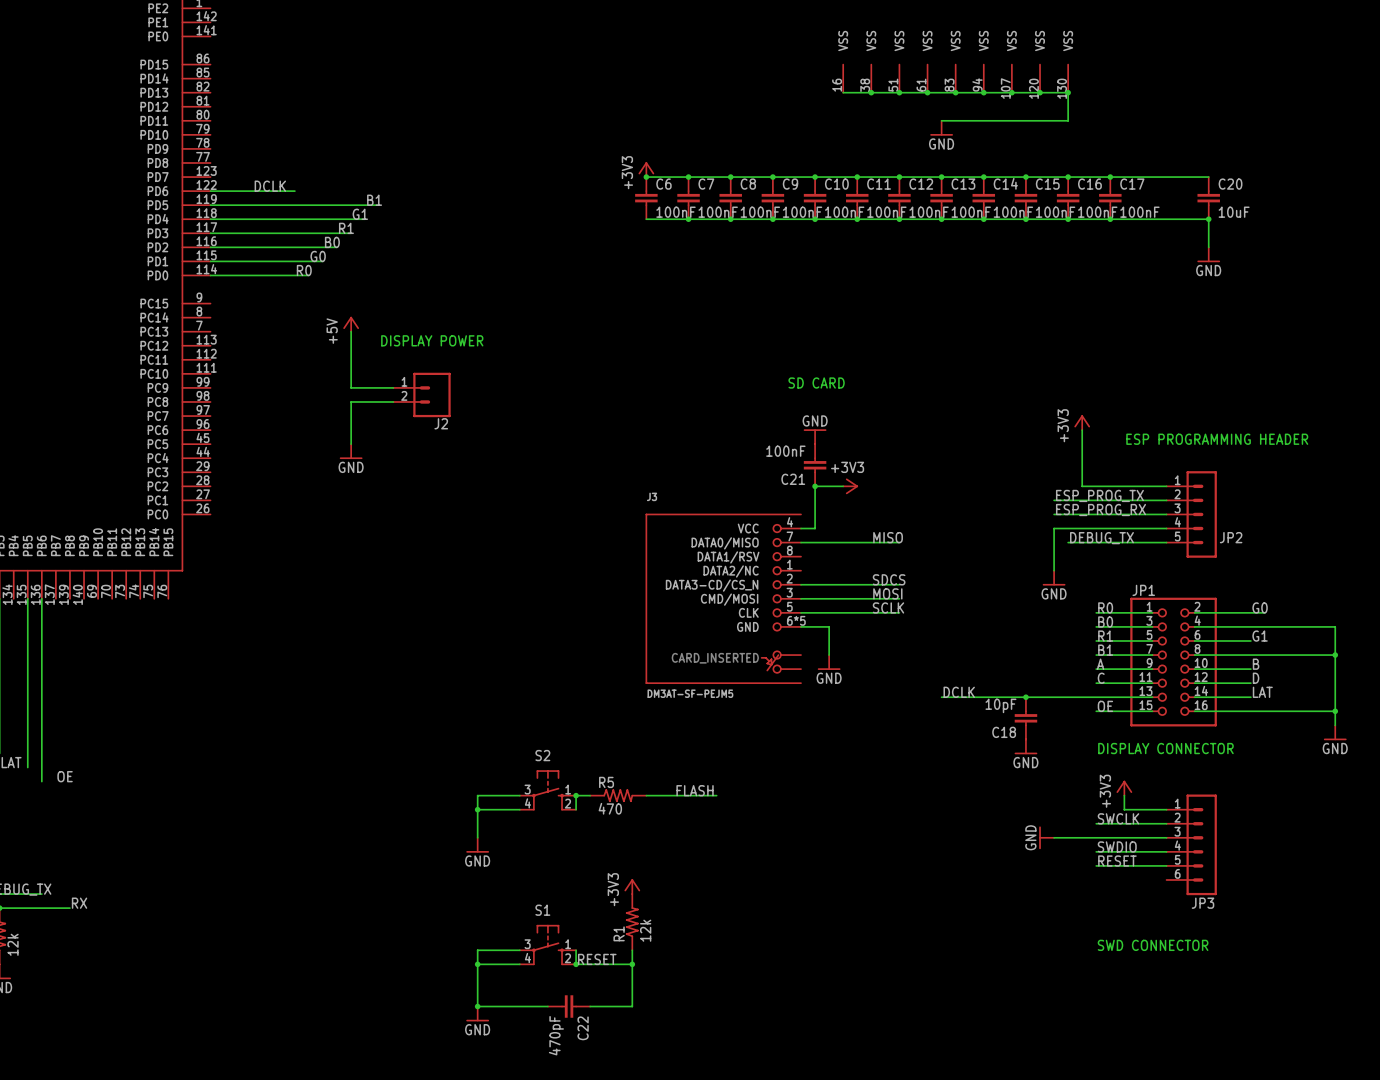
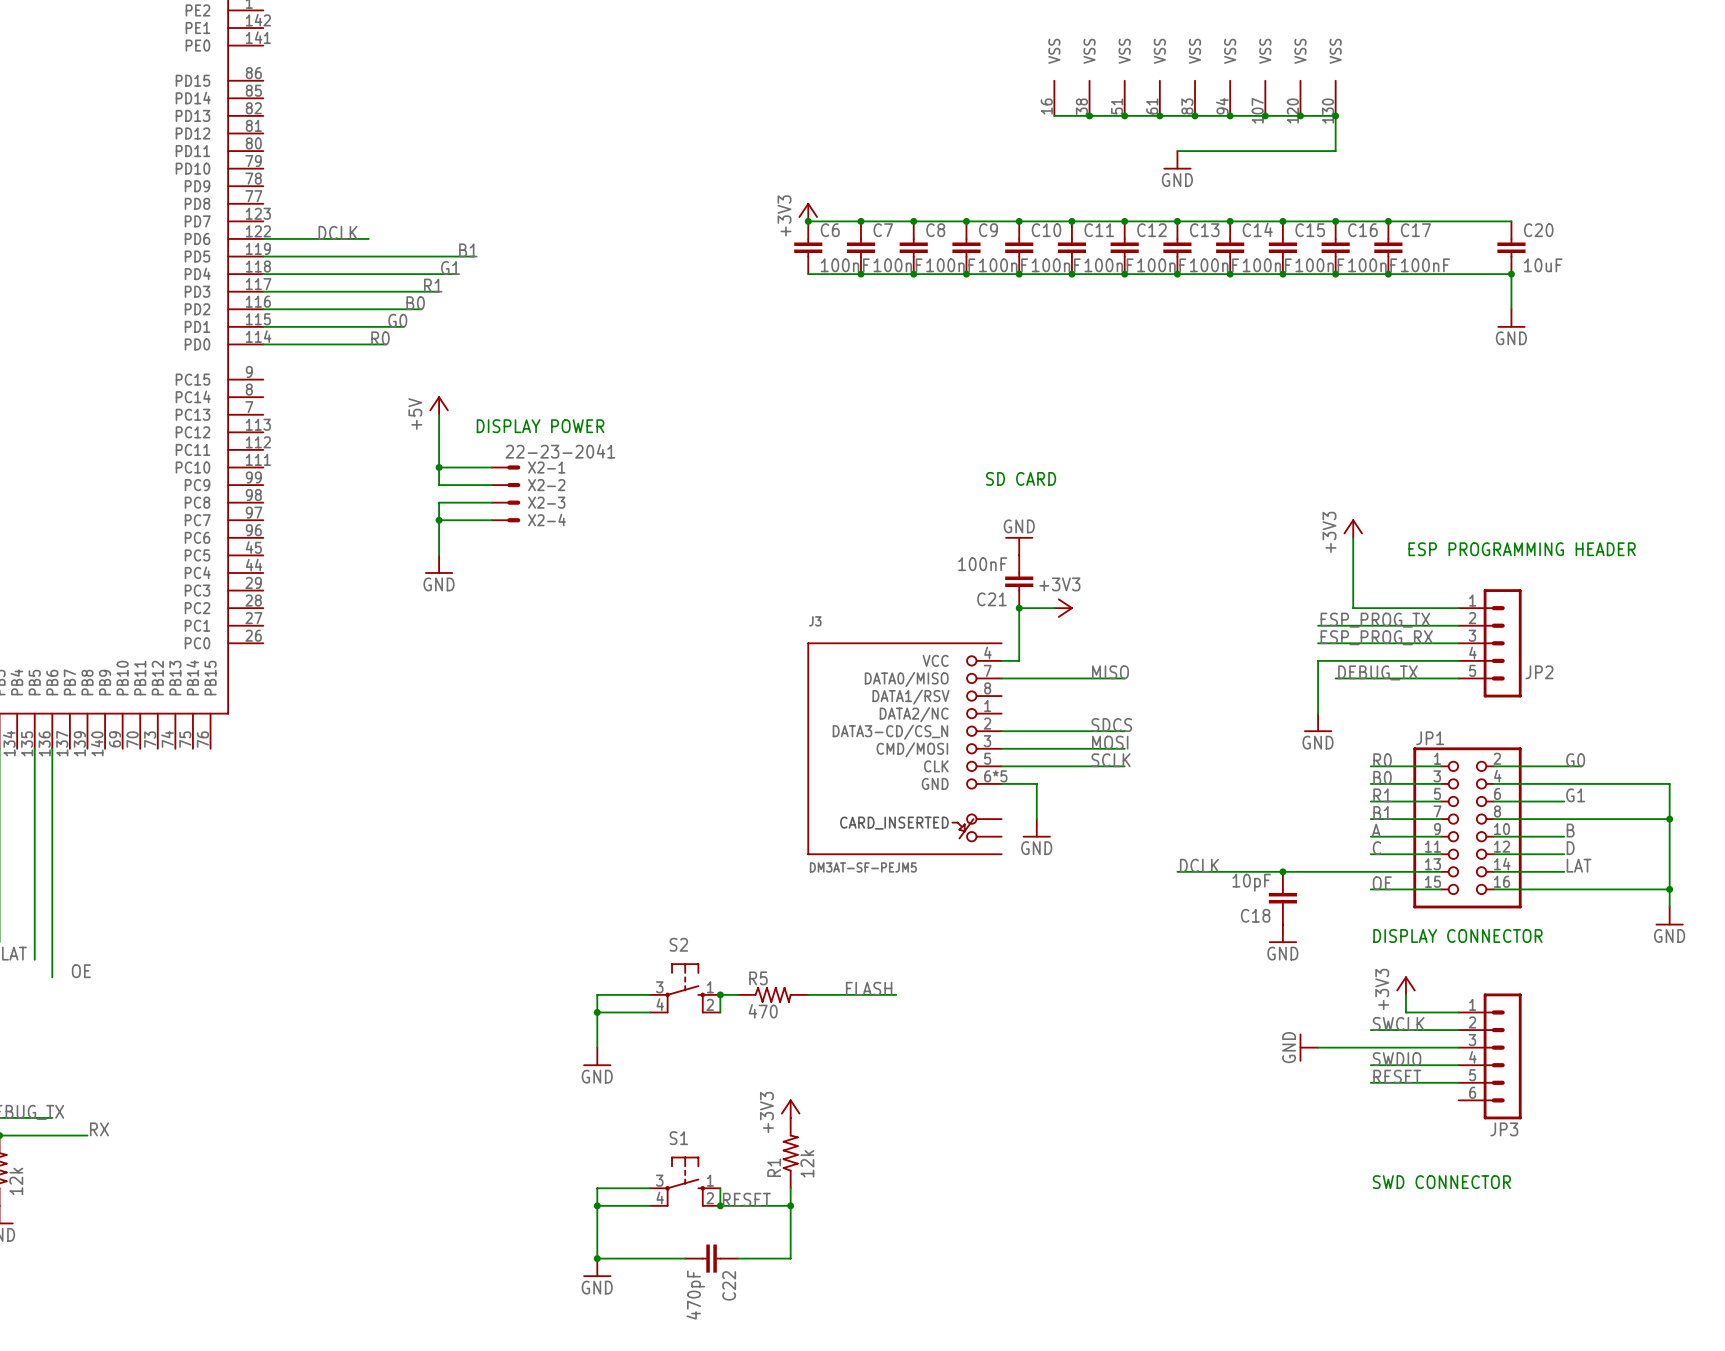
wire: none -> (439, 467) (491, 467)
junction: none -> (439, 467)
X2-1: none -> 22-23-2041 (506, 467)
X2-2: none -> (506, 485)
J2: (421, 394) -> none
X2-3: none -> (506, 502)
wire: none -> (439, 520) (491, 520)
junction: none -> (439, 520)
X2-4: none -> (506, 520)

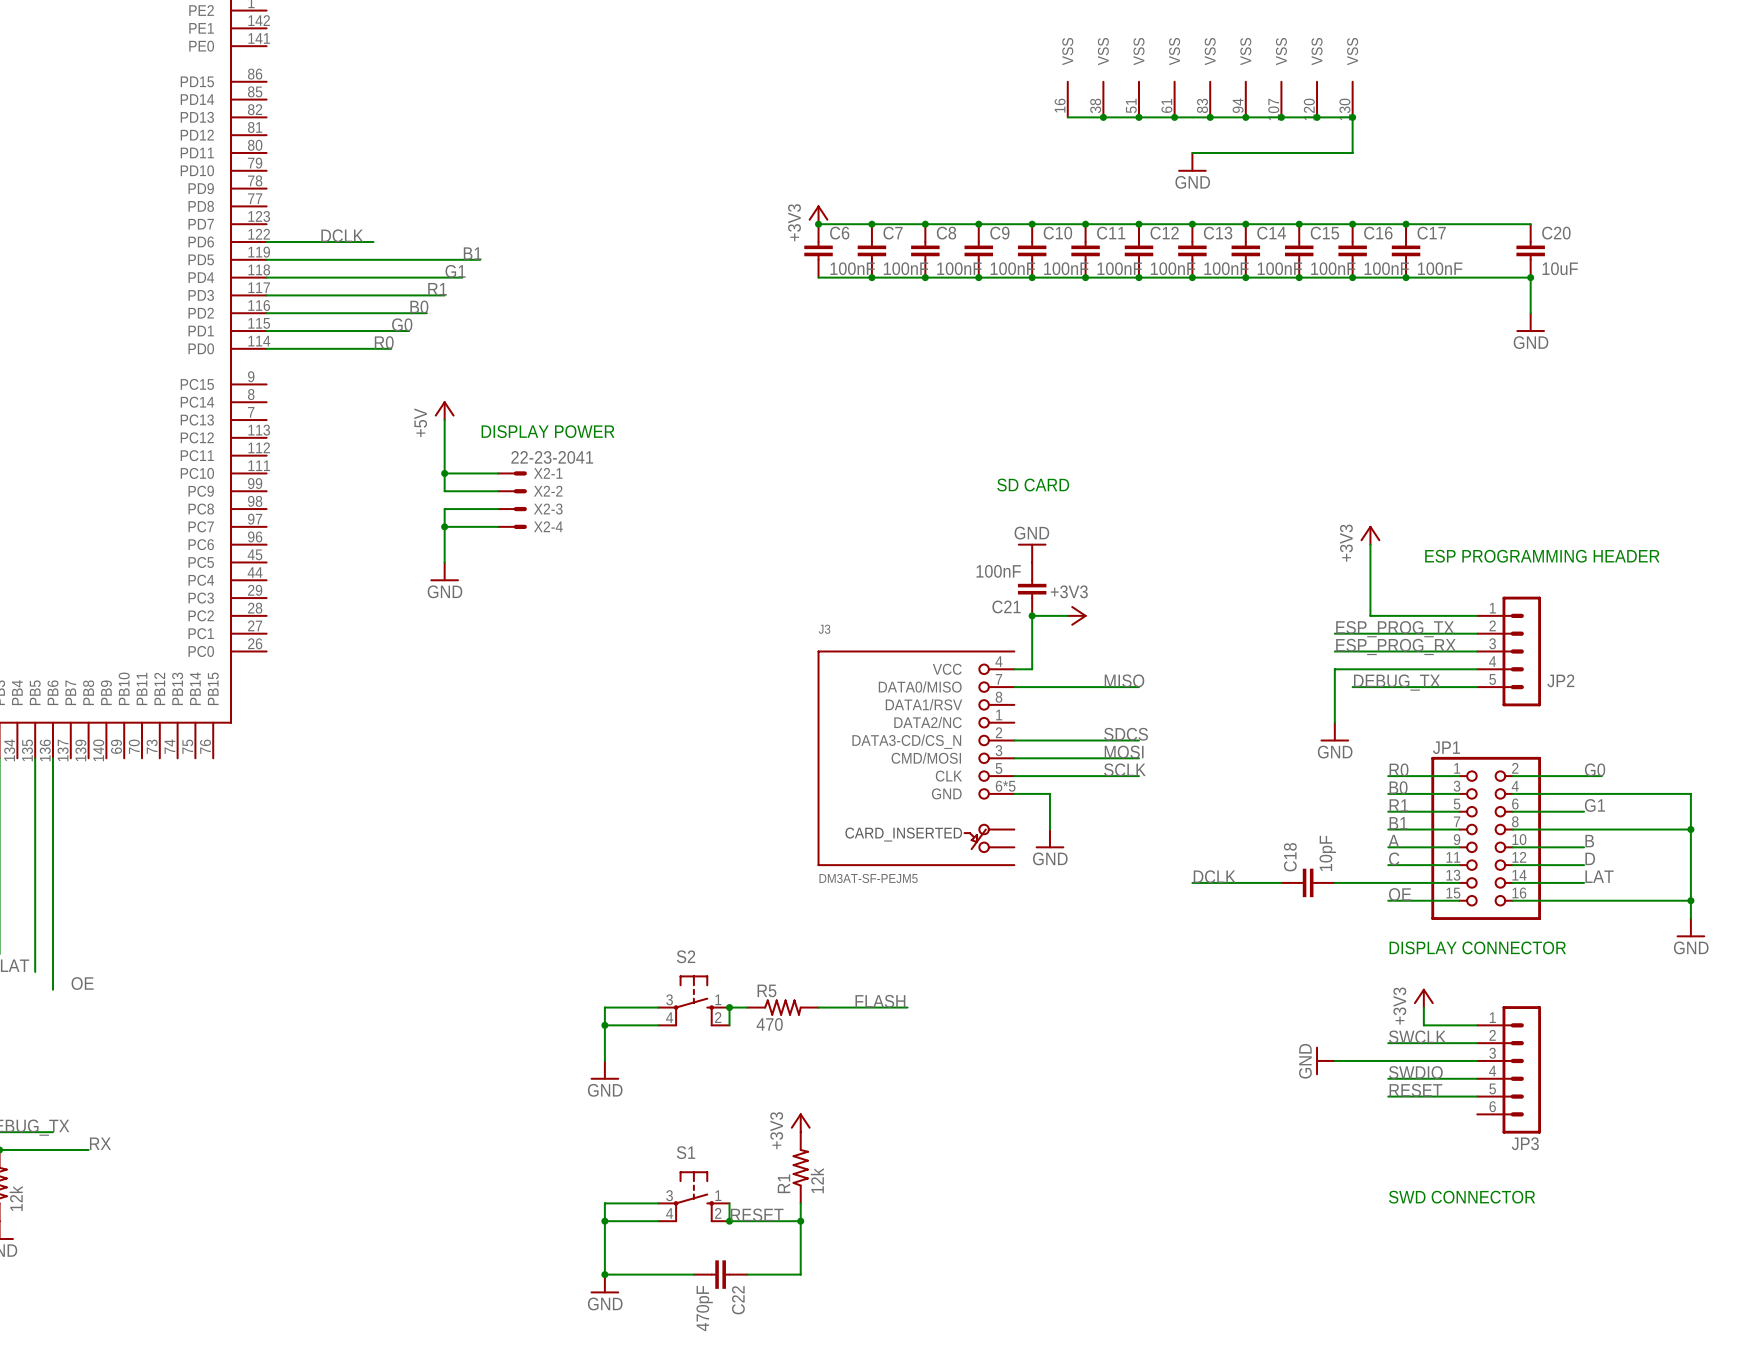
junction: (1282, 871) -> none
C18 rotation: 0° (1282, 898) -> 90° clockwise (1308, 882)
power symbol: GND (1282, 933) -> none

